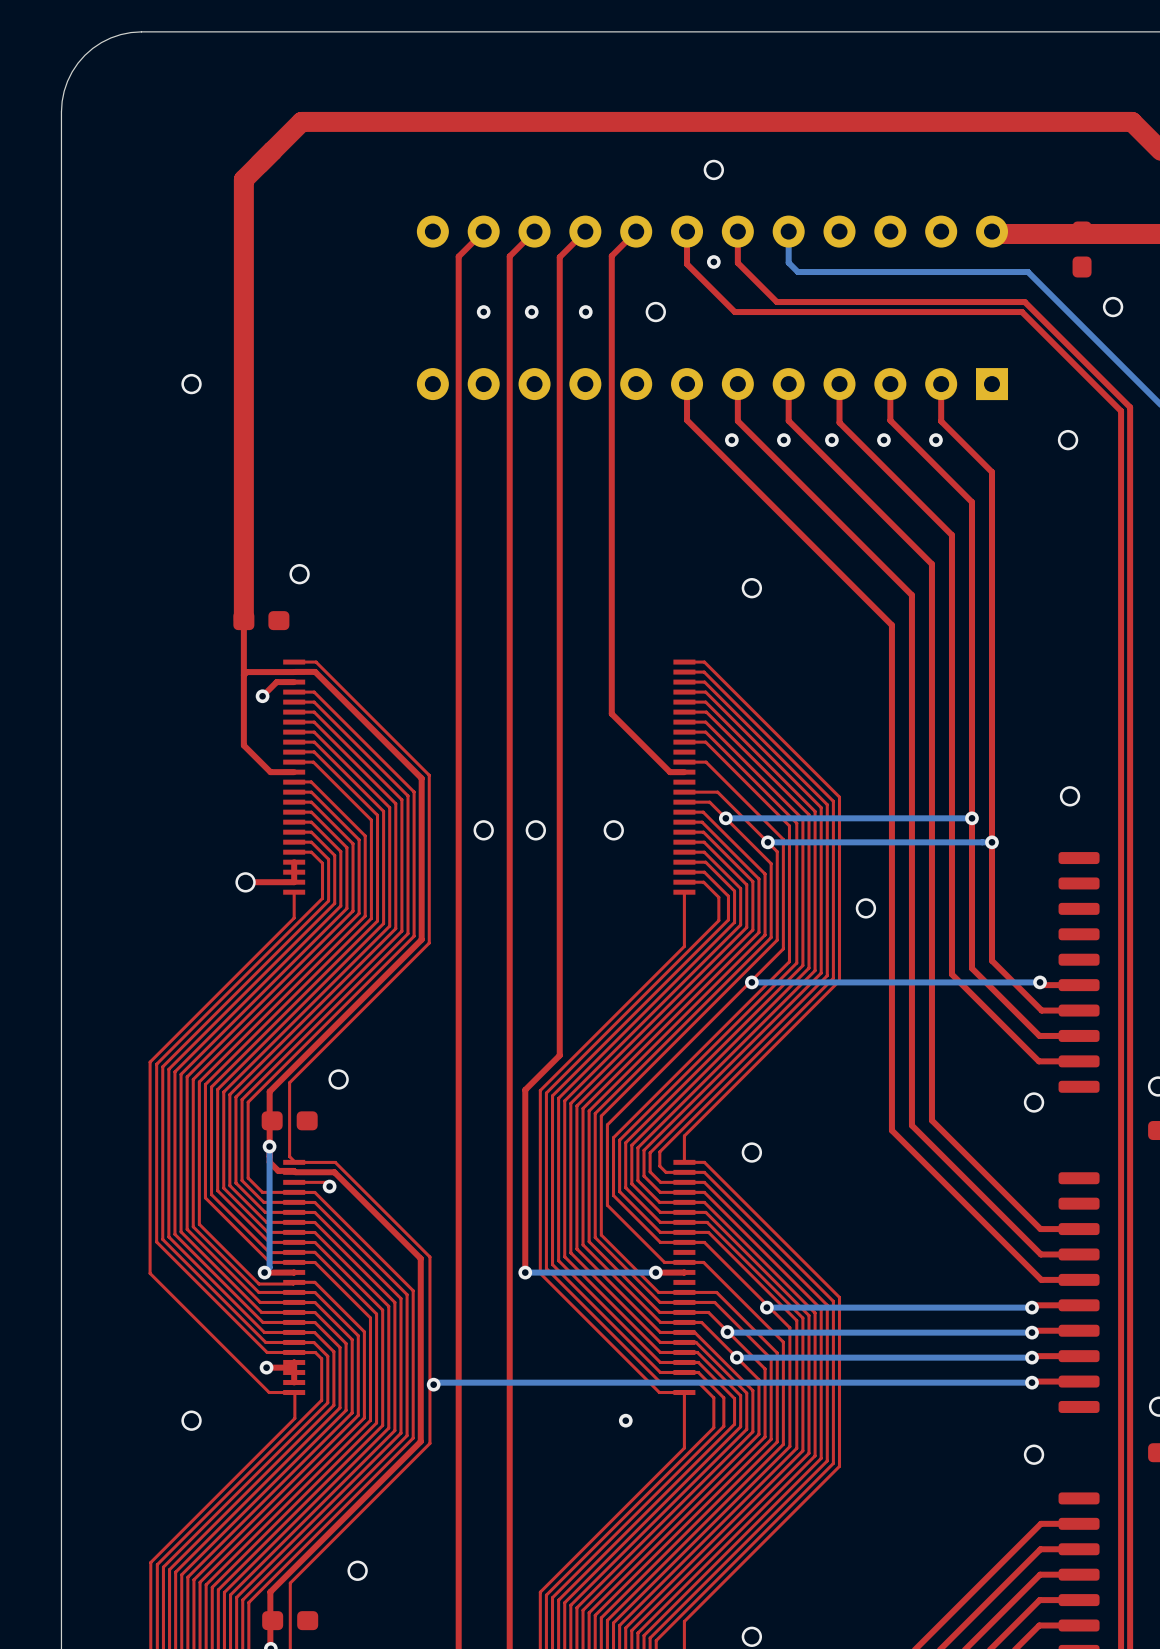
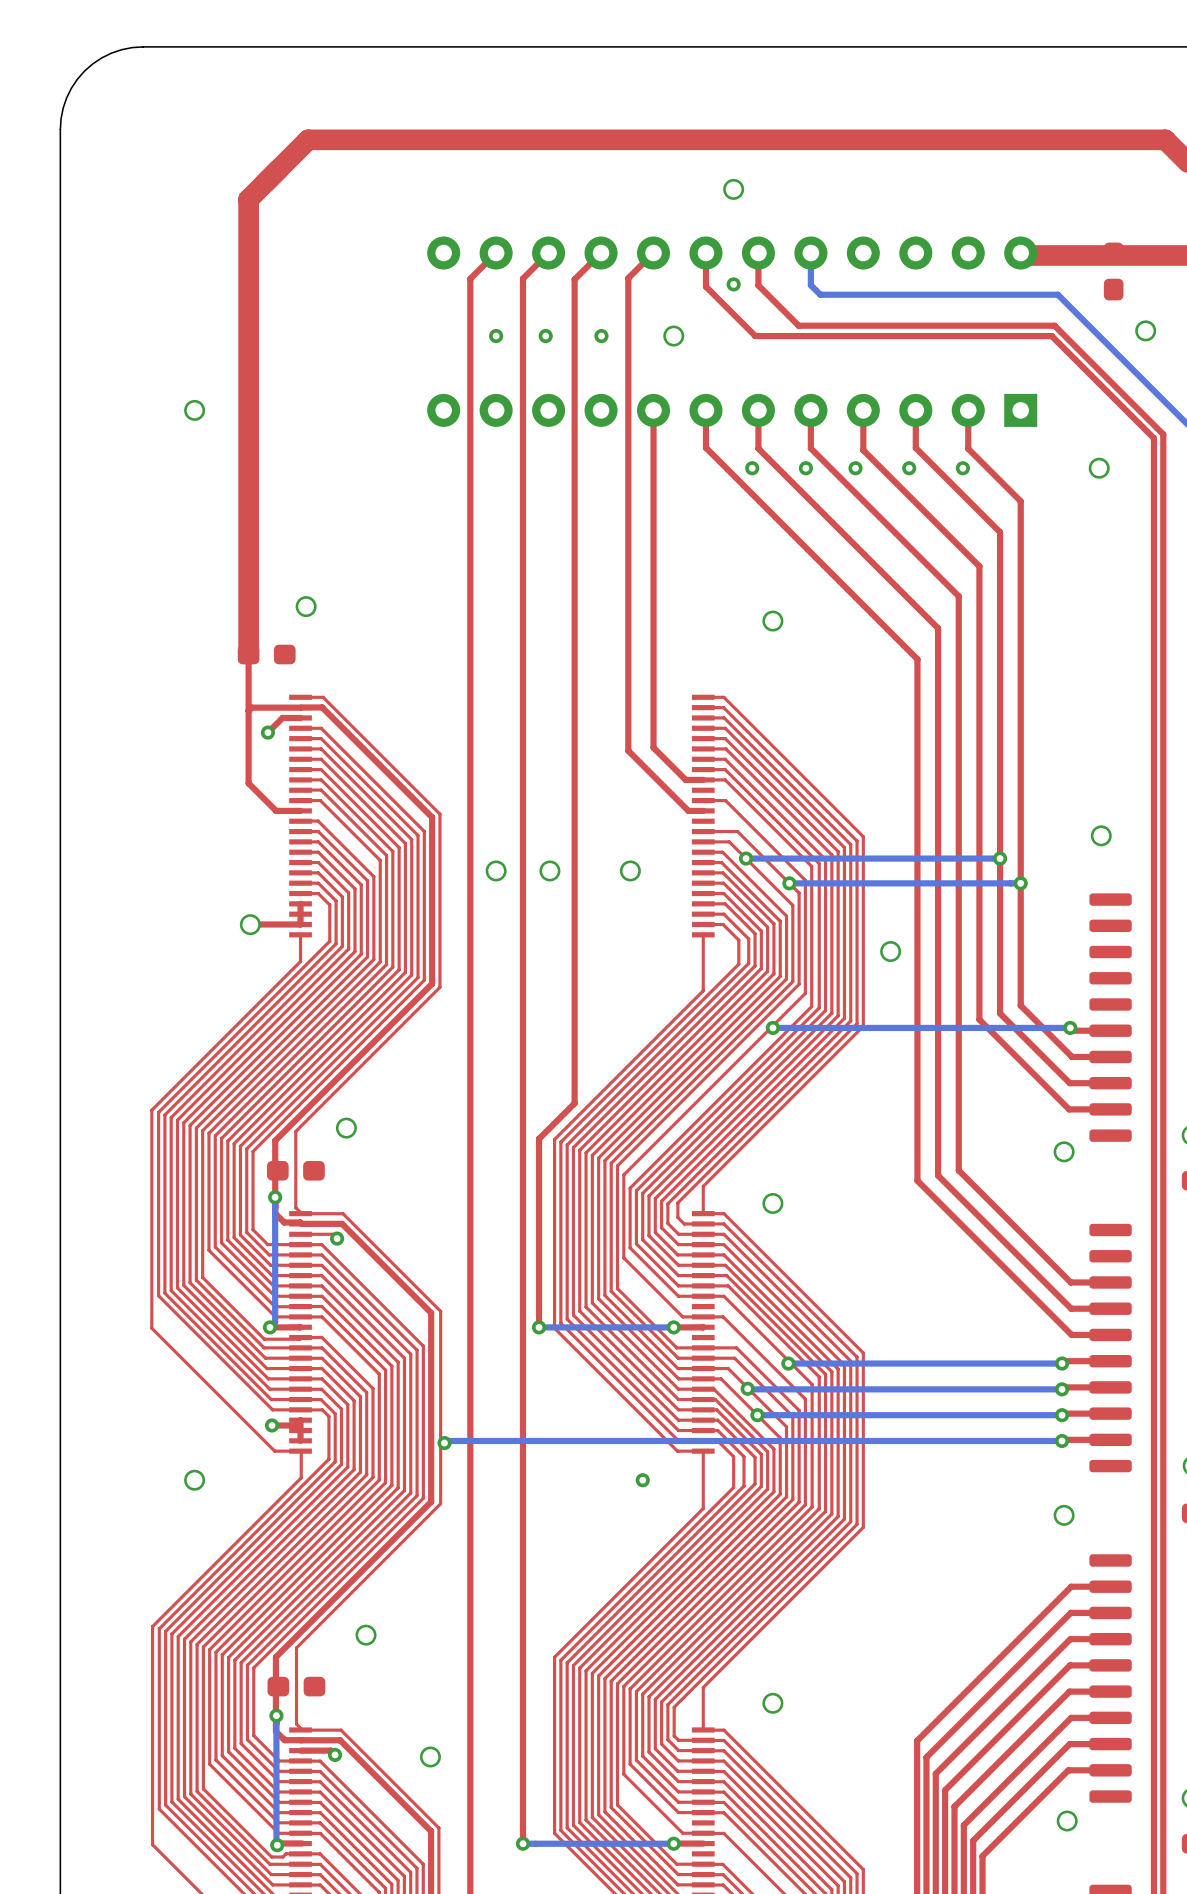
top track: none -> (653, 410) (653, 747) (685, 779) (703, 779)

